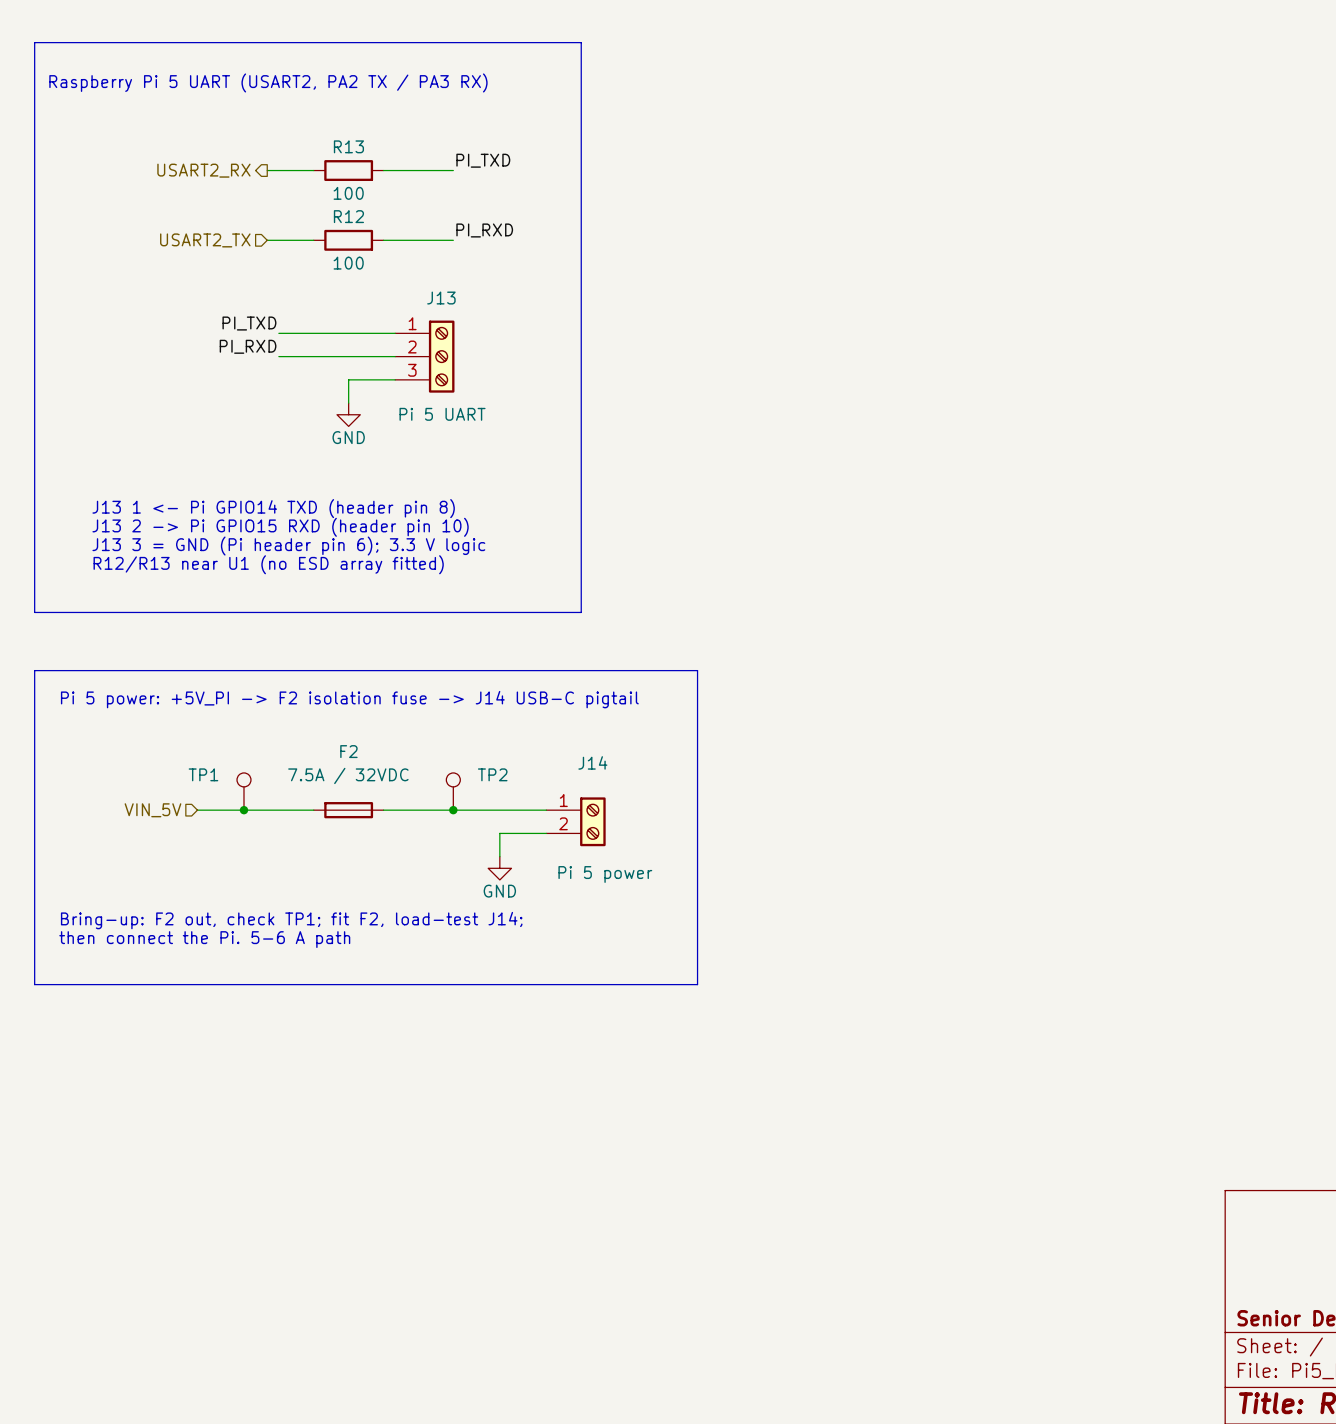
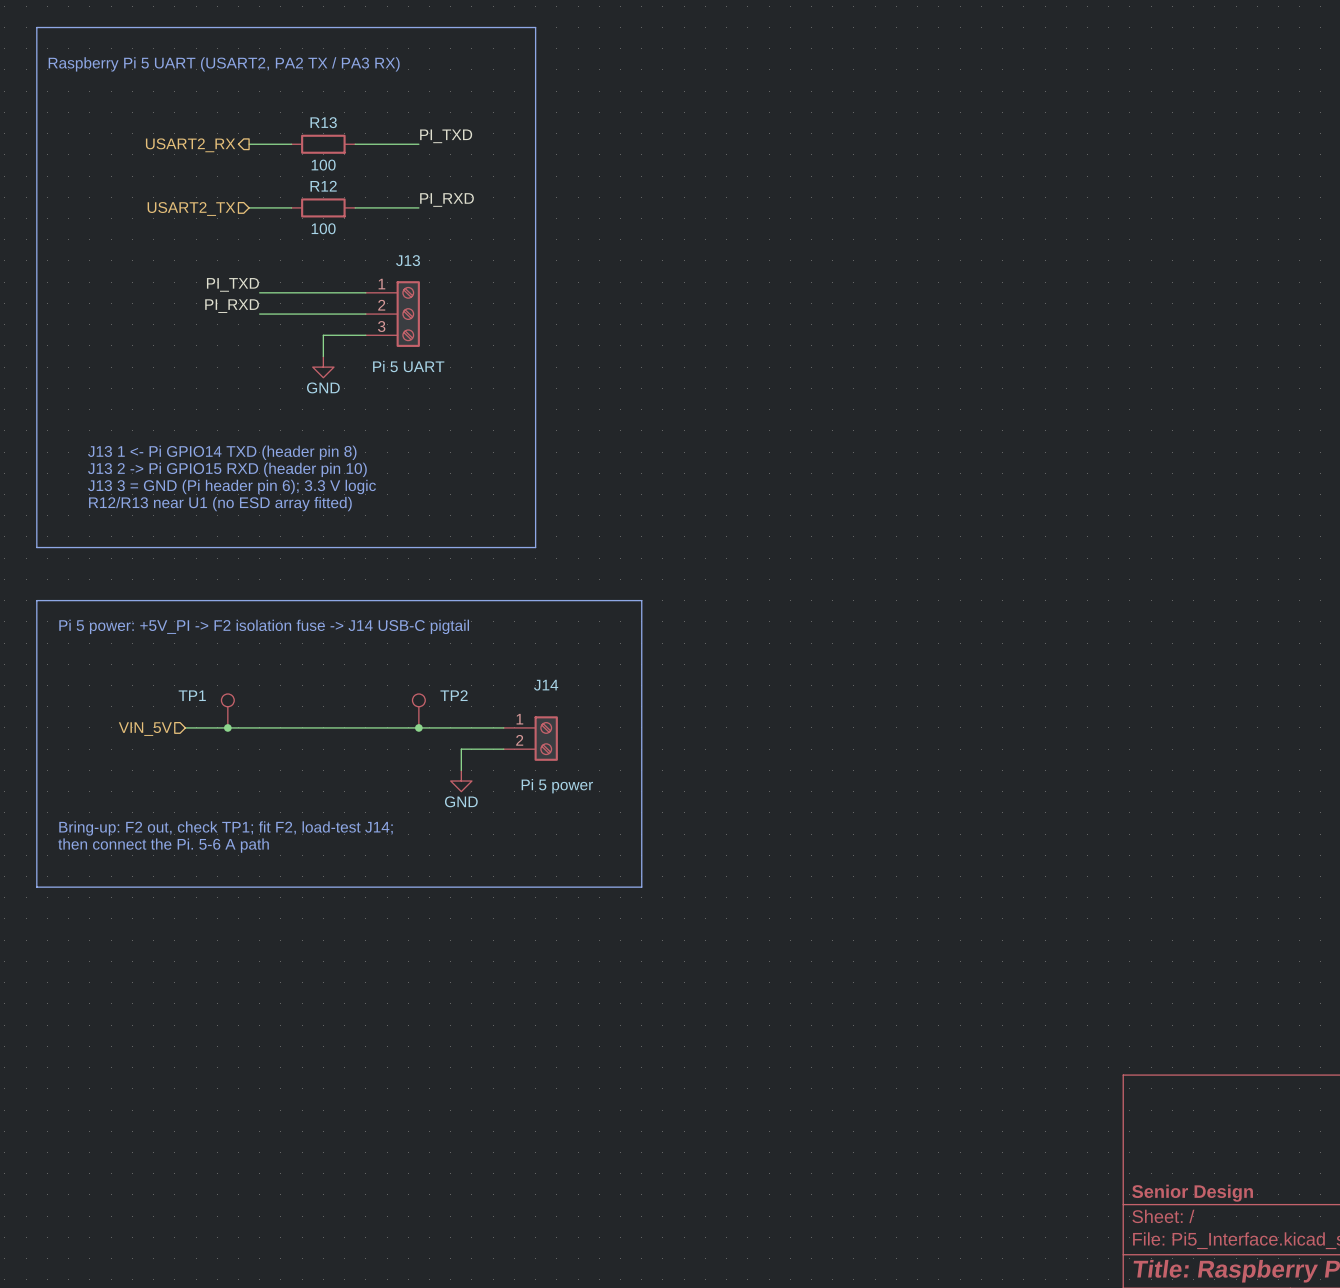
F2: 7.5A / 32VDC (348, 810) -> none

